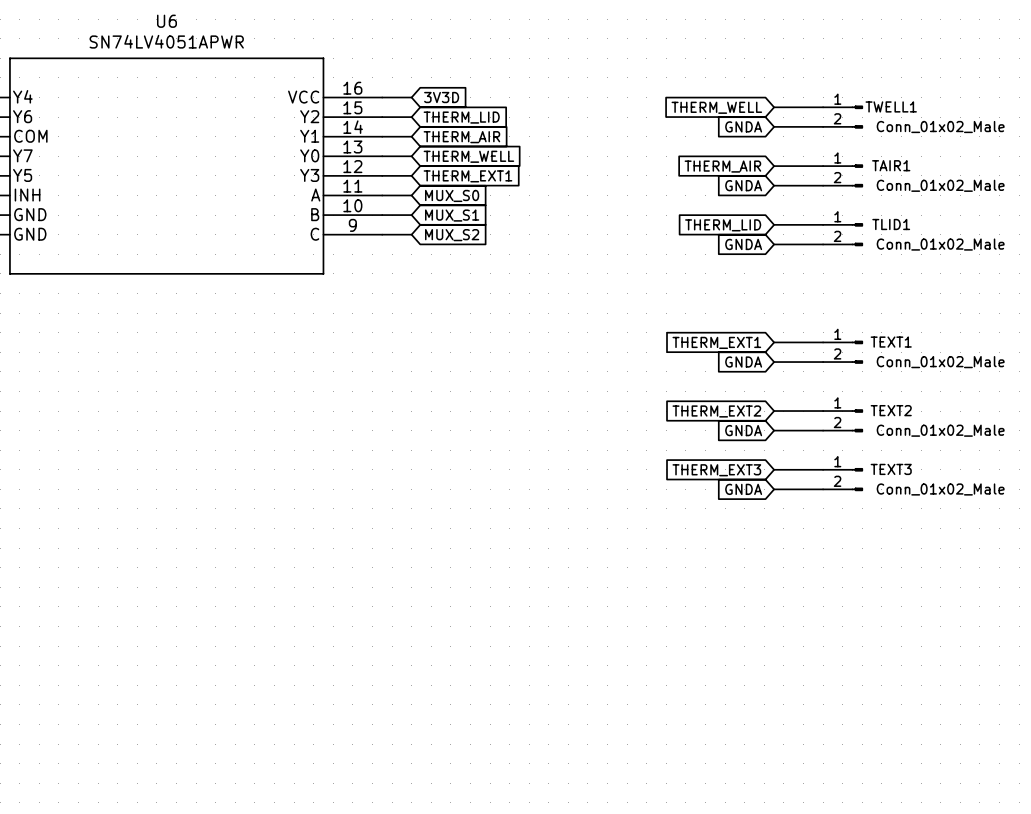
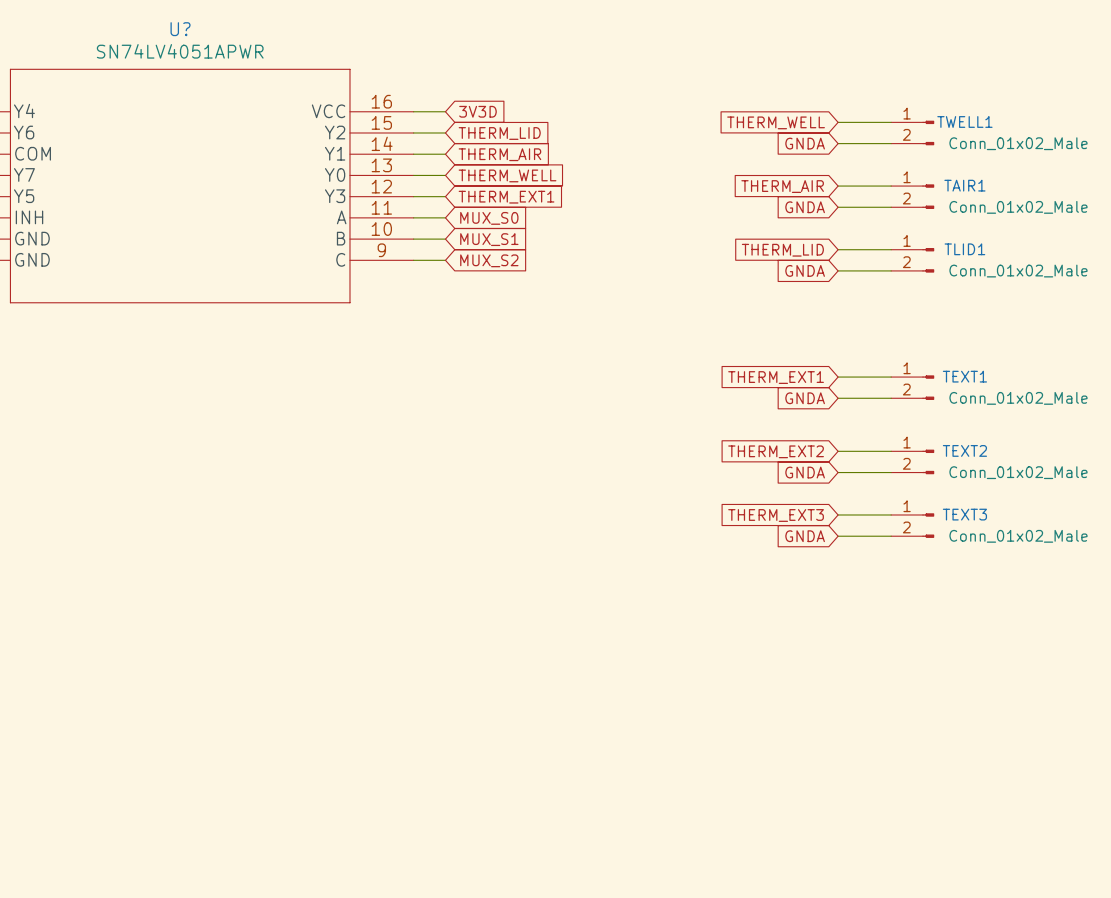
U6 name: U6 (166, 21) -> U? (180, 29)

